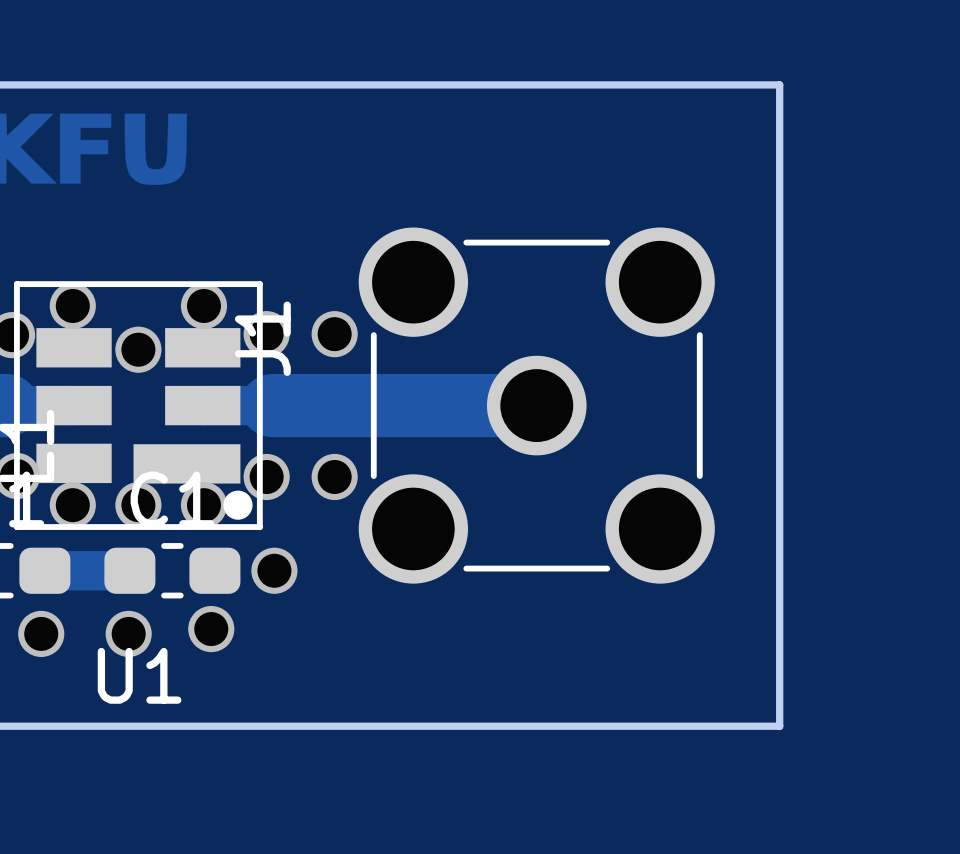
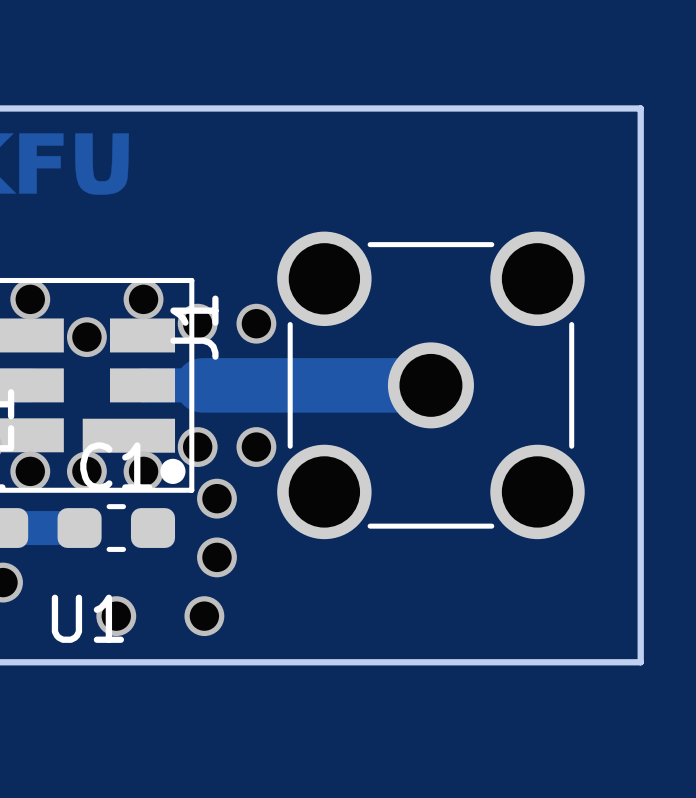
via: none -> (216, 498)
via: (274, 570) -> none
via: none -> (216, 557)
via: (211, 629) -> none
via: (128, 633) -> none
via: none -> (116, 616)
via: none -> (204, 616)

